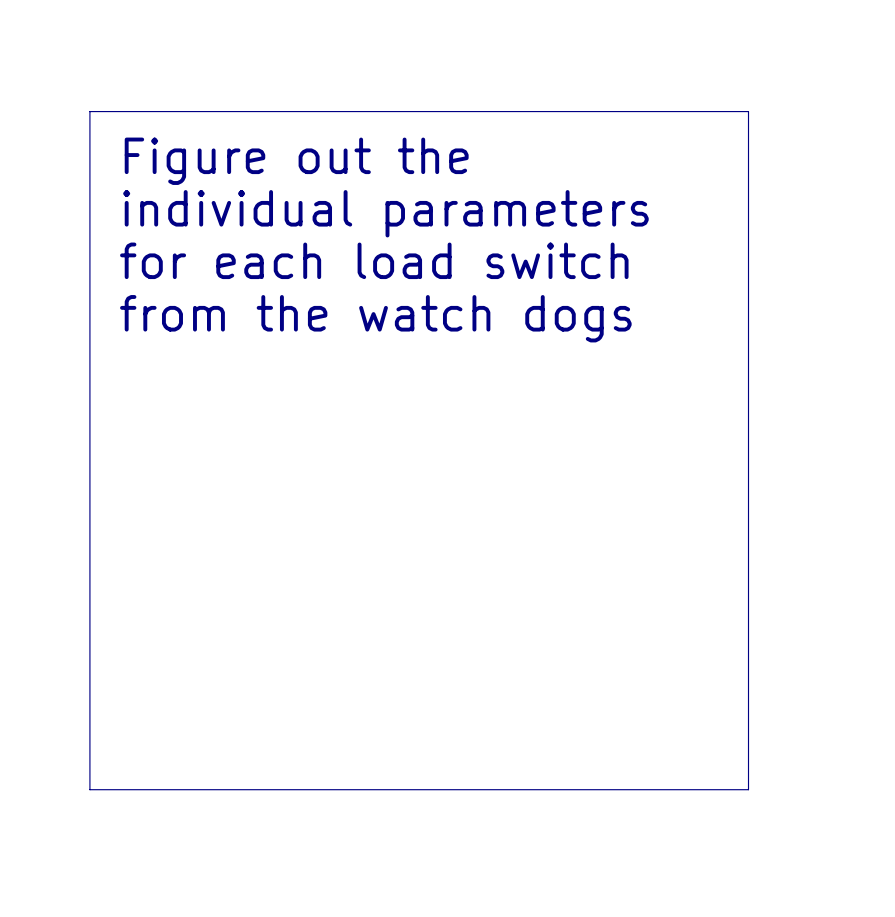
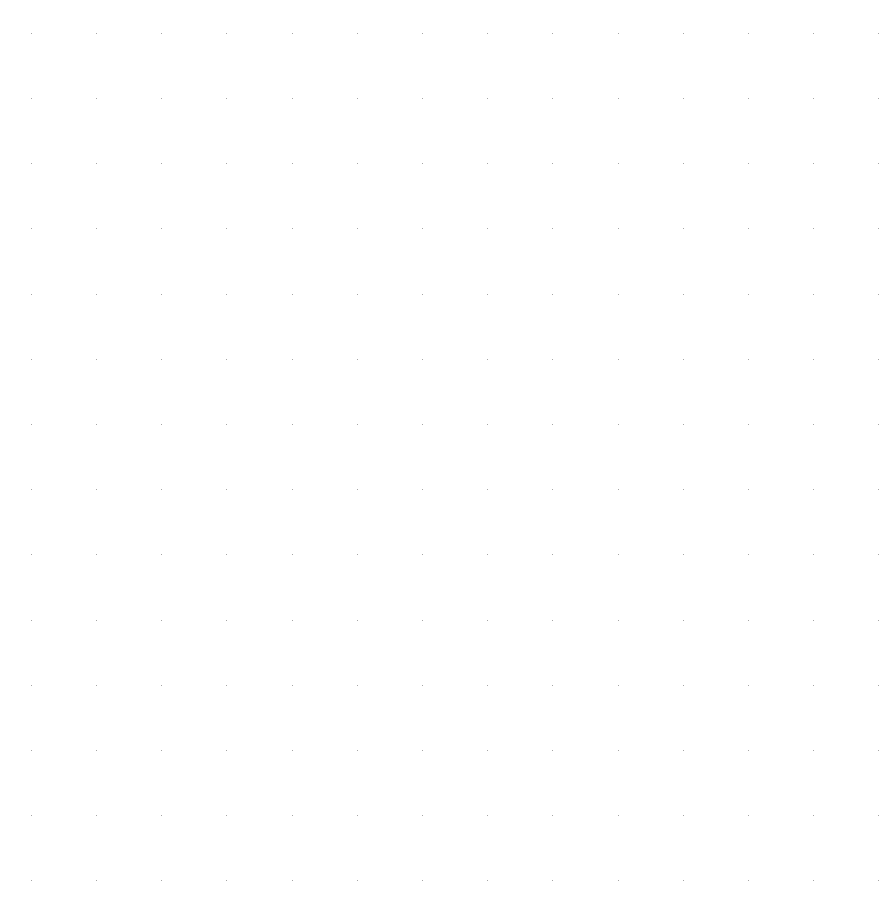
line: (89, 111) (748, 111) (748, 789) (89, 789) (89, 111) -> none
text: Figure out the (296, 161) -> none
text: individual parameters (385, 213) -> none
text: for each load switch (374, 260) -> none
text: from the watch dogs (375, 318) -> none

